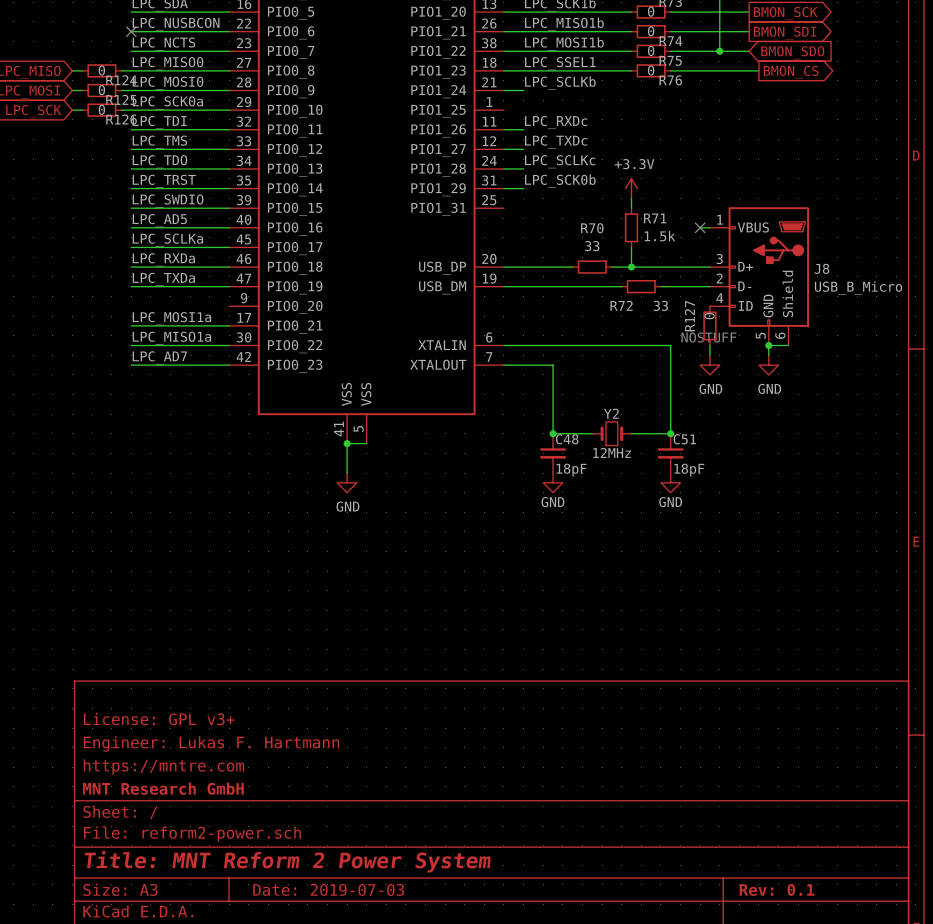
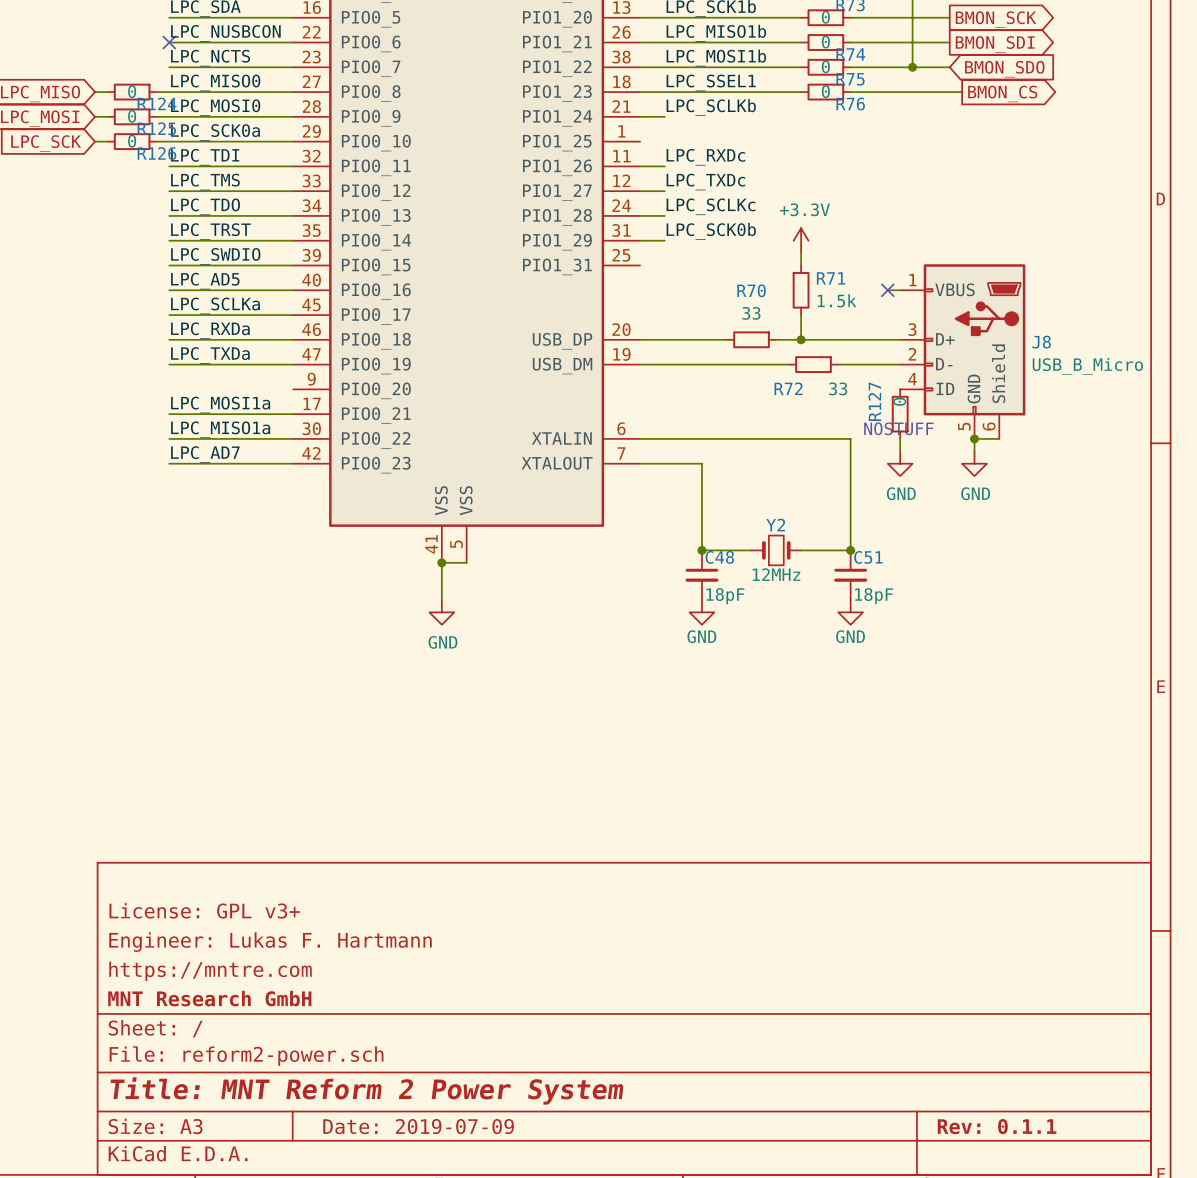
title block: Date: 2019-07-03 (328, 889) -> Date: 2019-07-09 (418, 1126)
title block: Rev: 0.1 (777, 889) -> Rev: 0.1.1 (997, 1126)

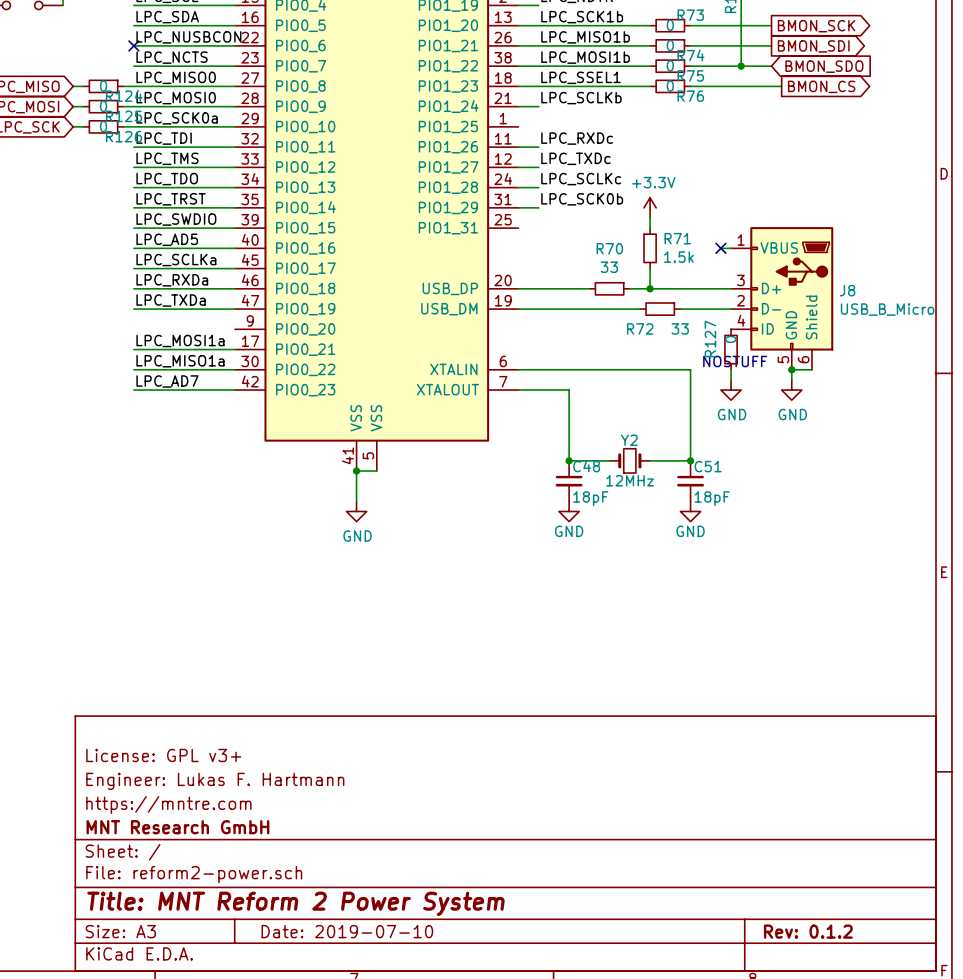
title block: Date: 2019-07-09 (418, 1126) -> Date: 2019-07-10 (347, 931)
title block: Rev: 0.1.1 (997, 1126) -> Rev: 0.1.2 (808, 931)

